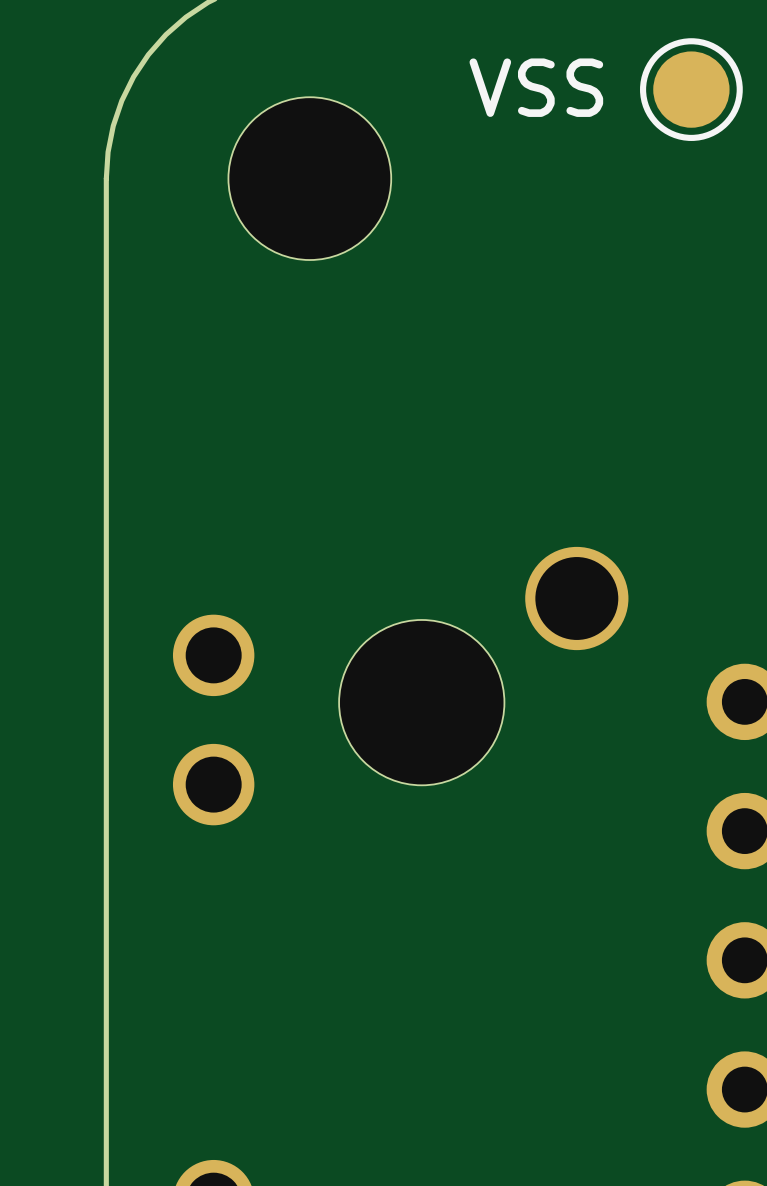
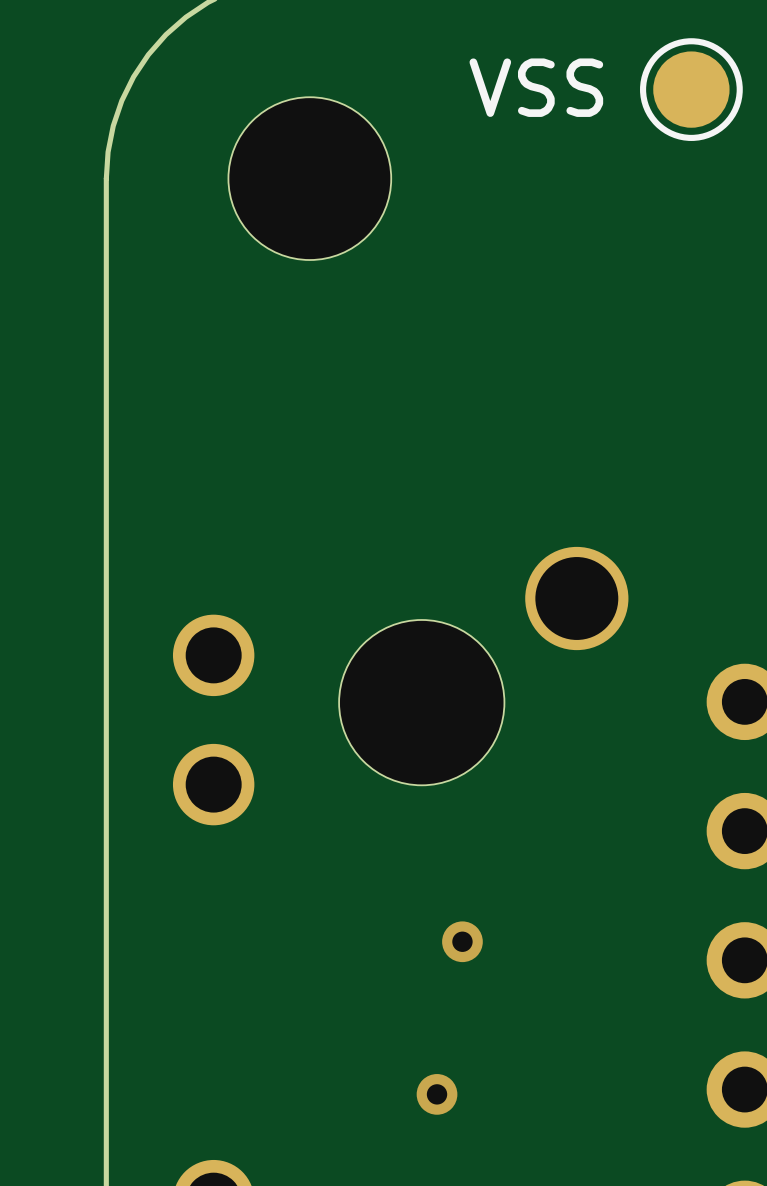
via: none -> (462, 941)
via: none -> (437, 1094)

